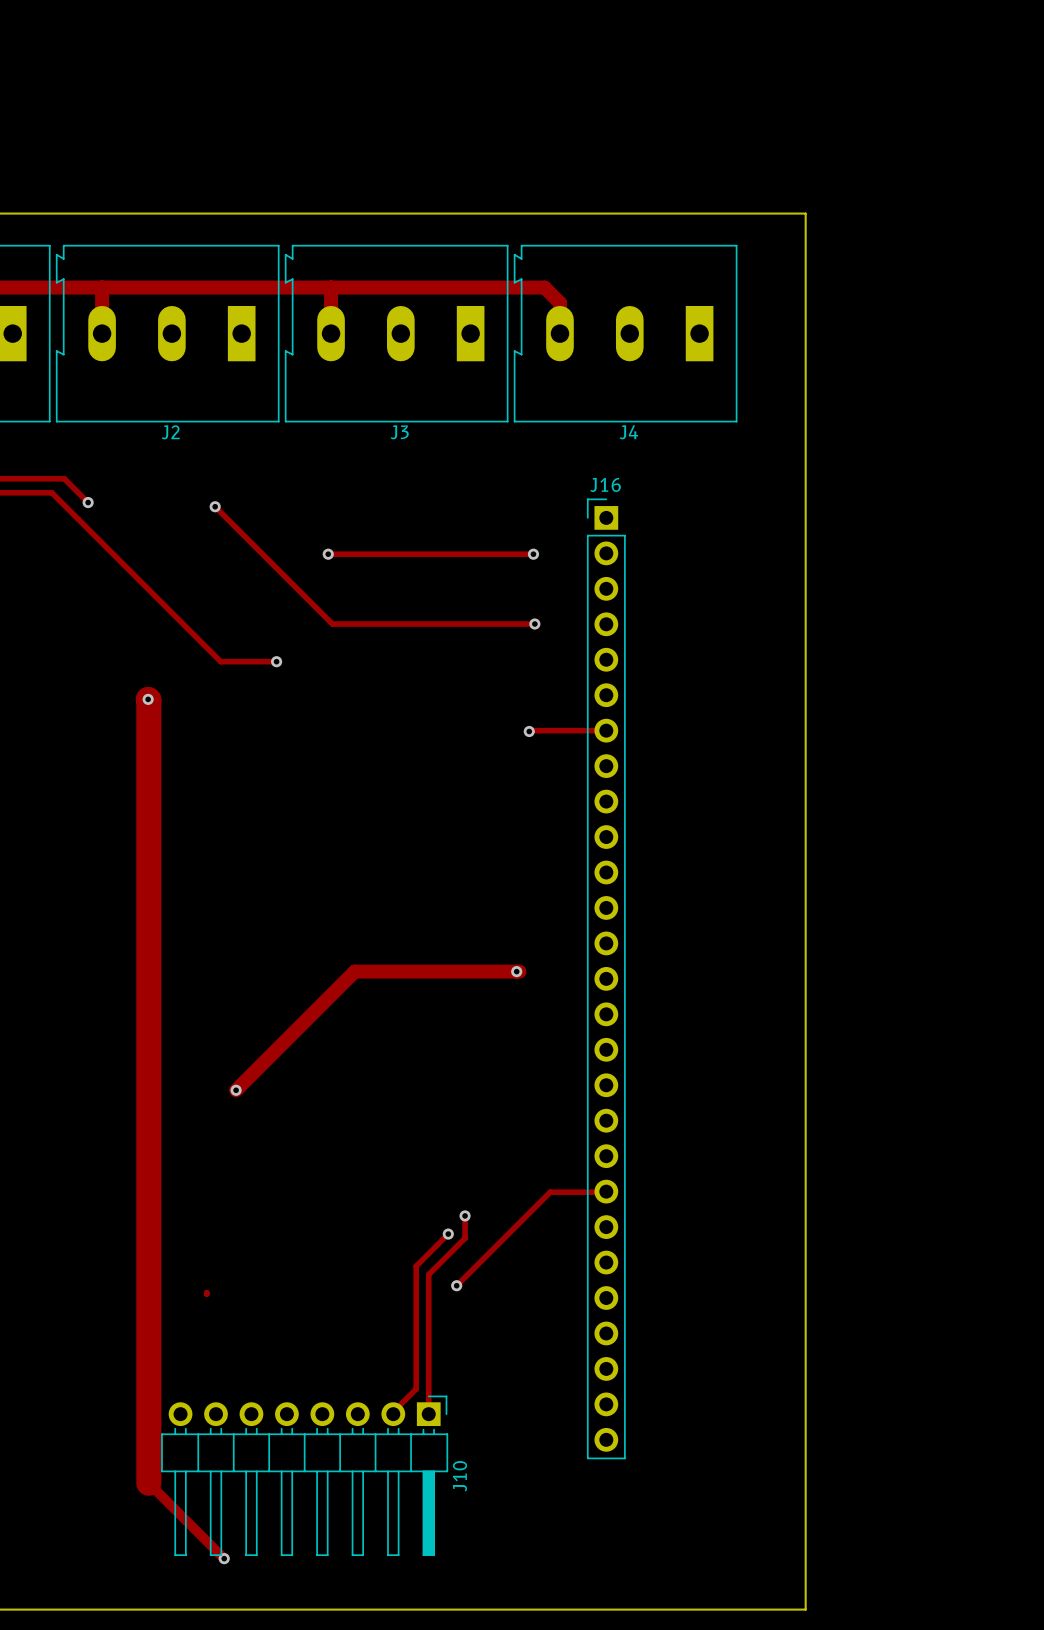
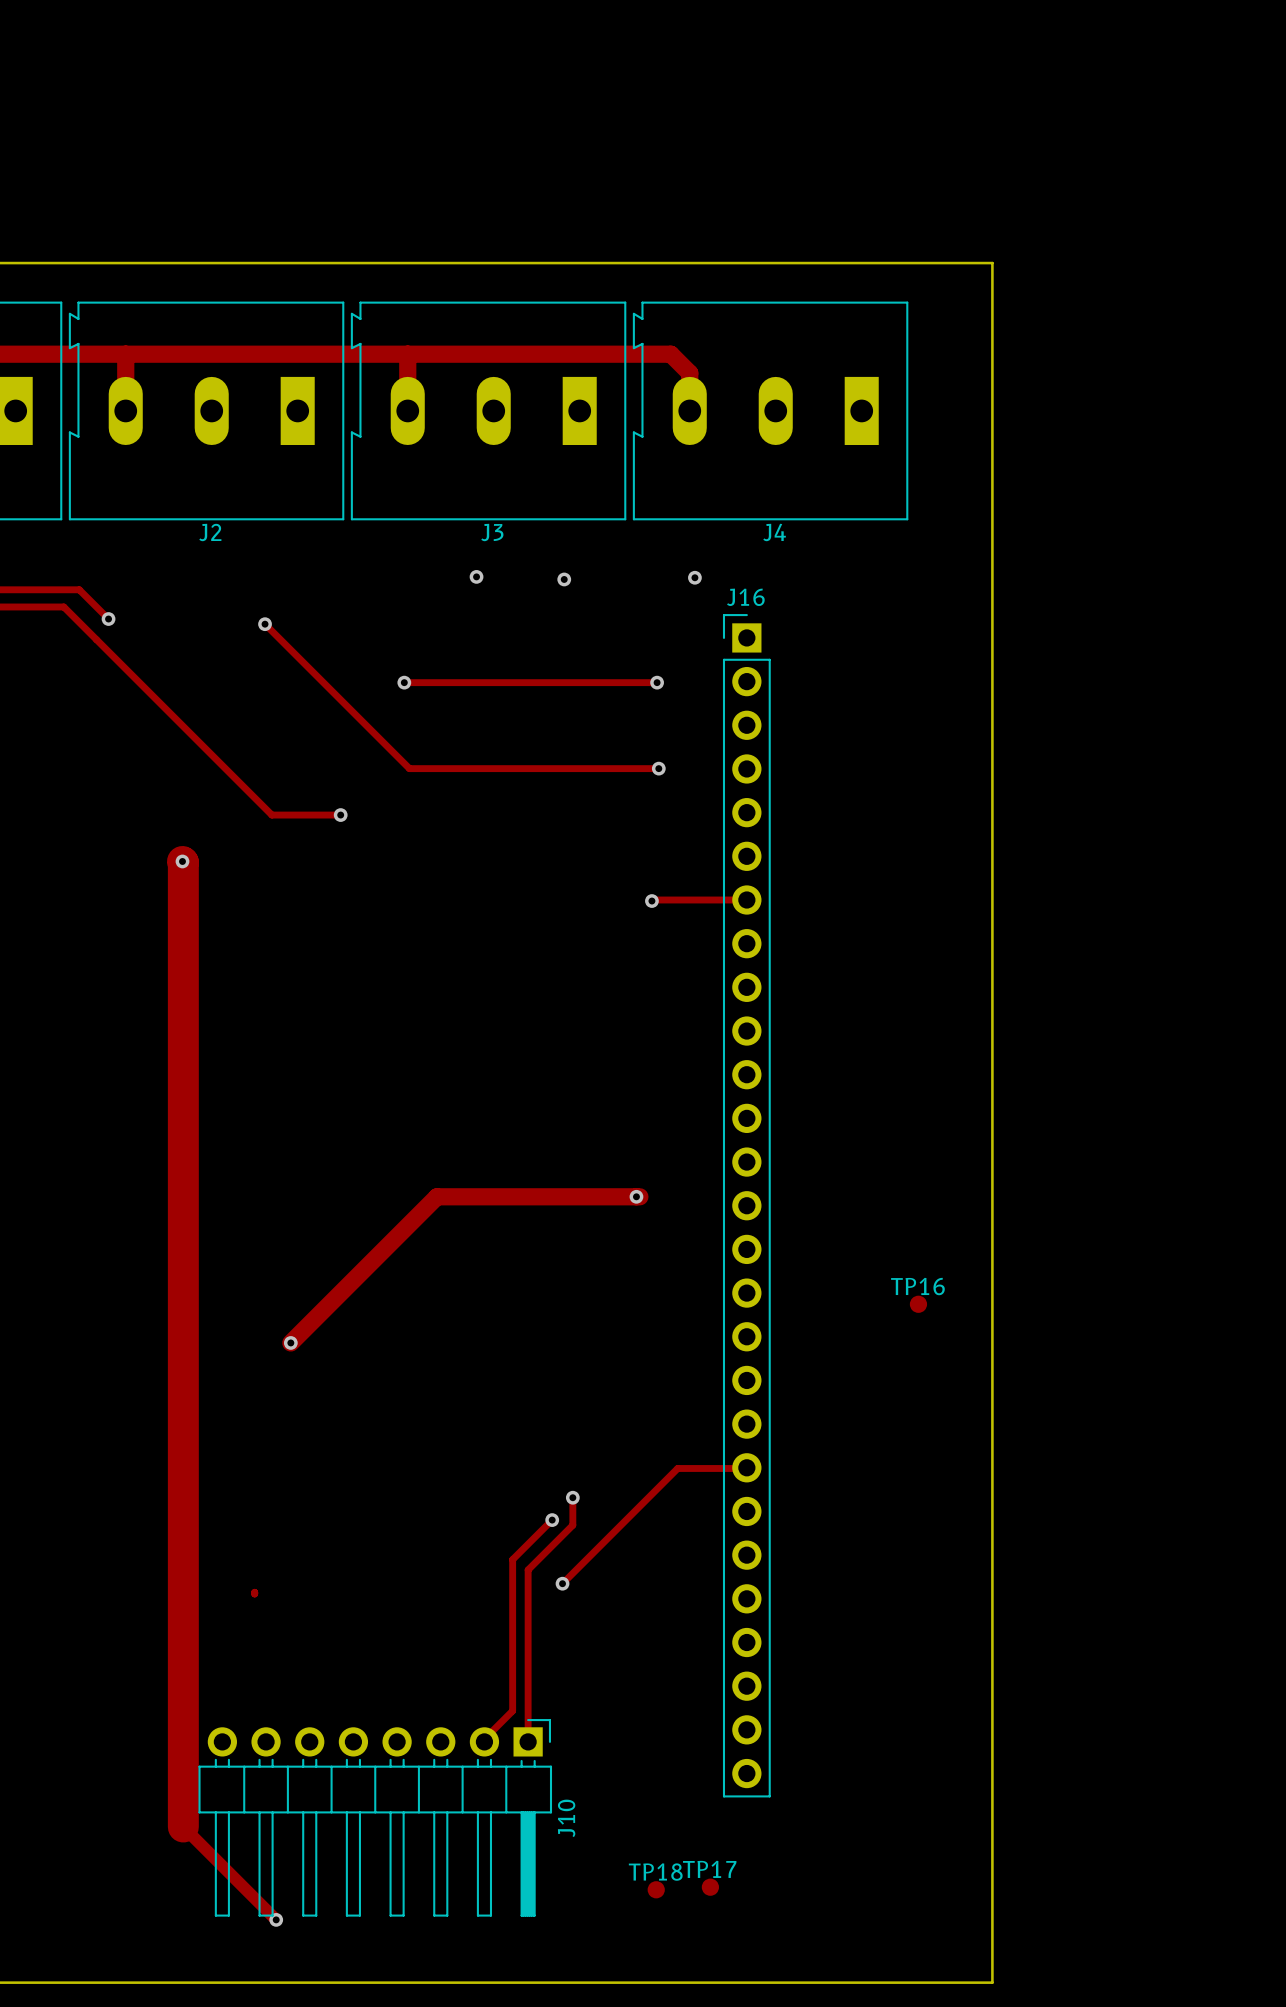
via: none -> (476, 576)
via: none -> (694, 577)
via: none -> (564, 579)
TP16: none -> (918, 1304)
TP17: none -> (710, 1887)
TP18: none -> (656, 1889)

